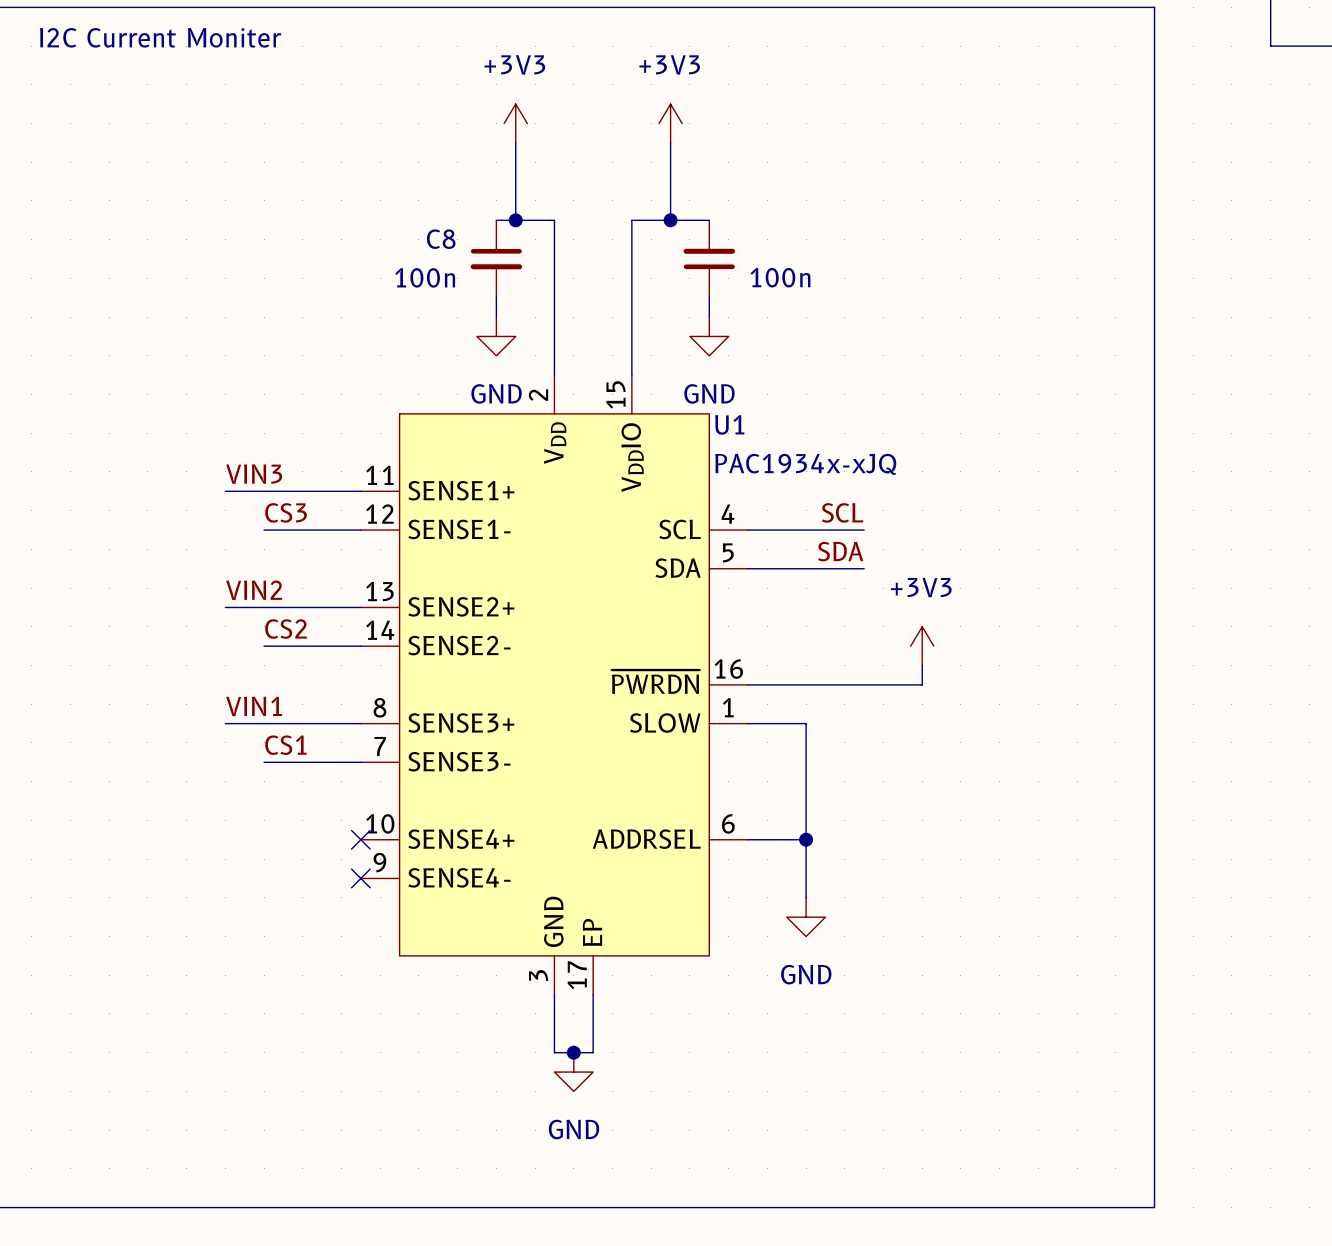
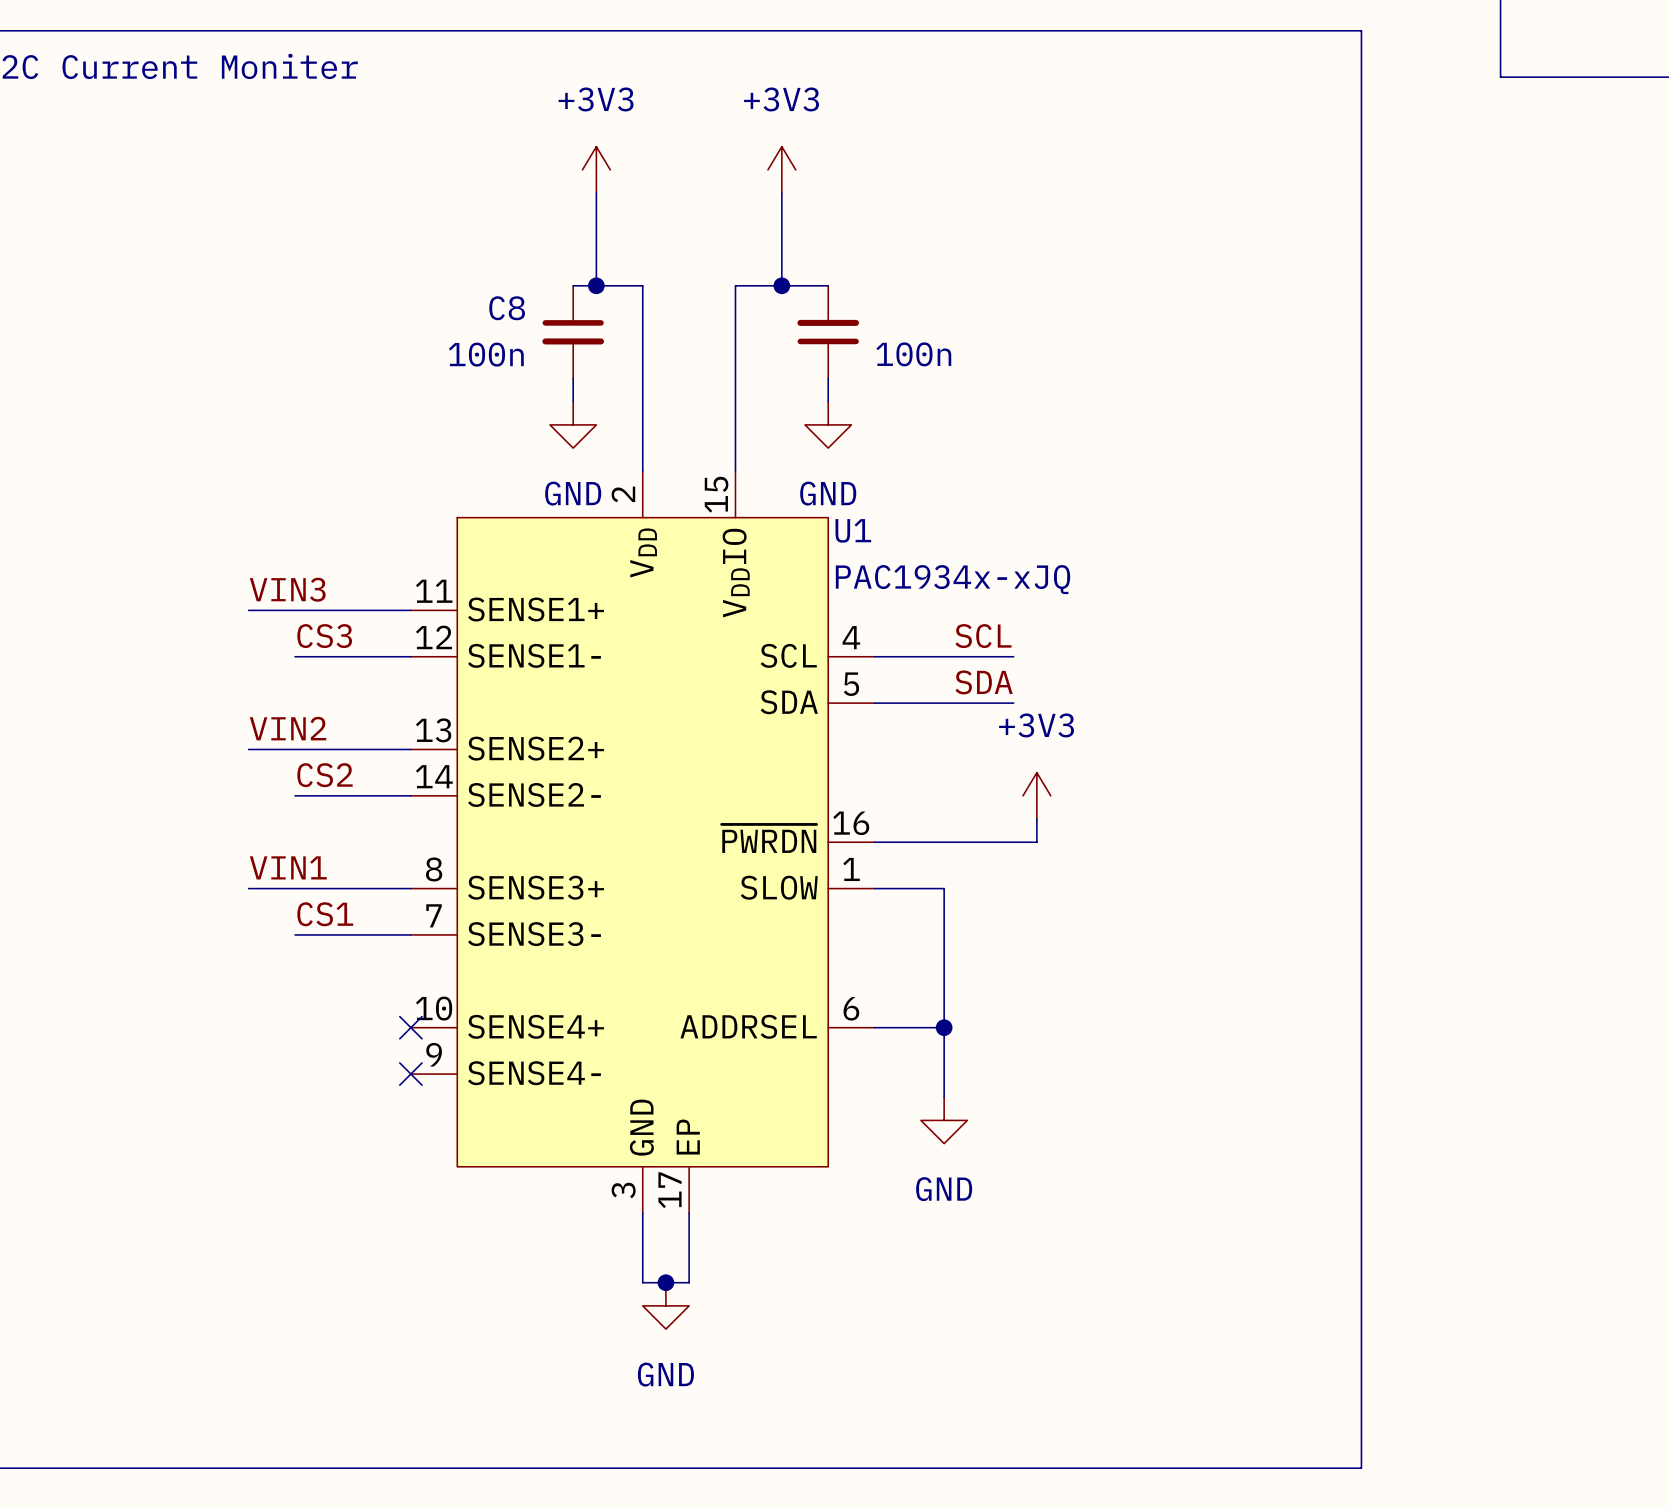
power symbol position: +3V3 (922, 646) -> +3V3 (1036, 795)
wire: (922, 665) (922, 684) (883, 684) -> (1036, 819) (1036, 842)

